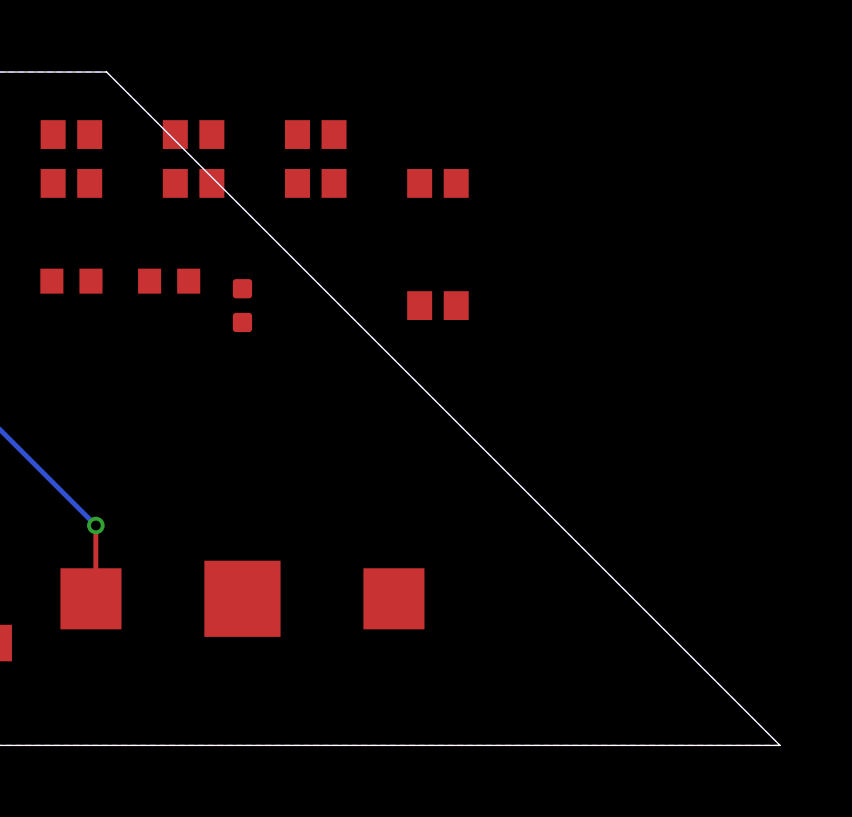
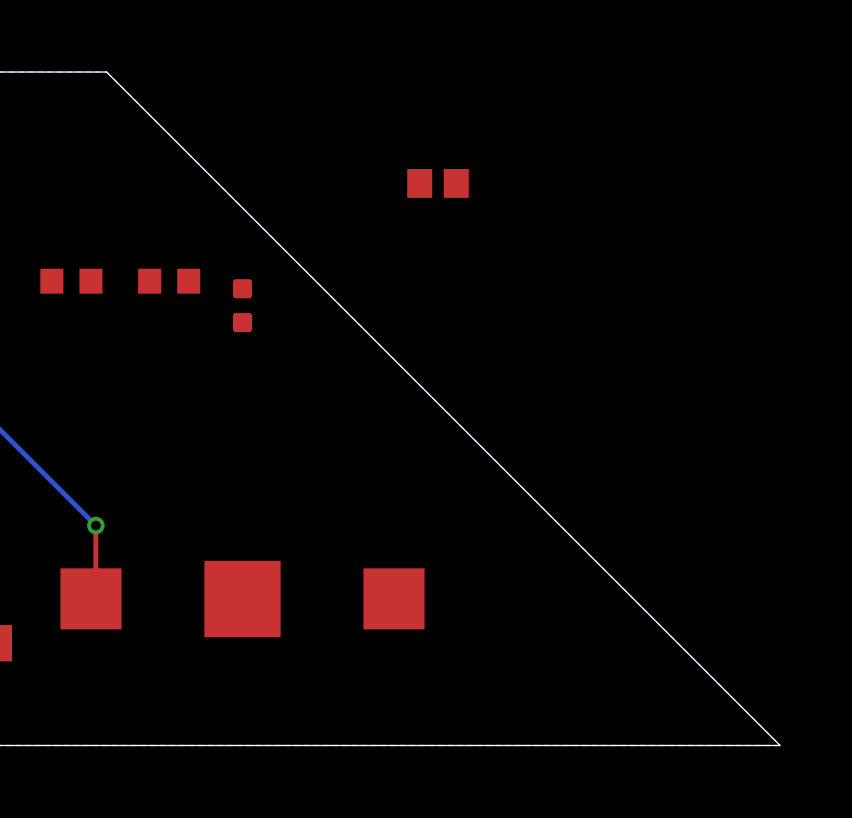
part: (71, 134) -> none
part: (193, 134) -> none
part: (315, 134) -> none
part: (71, 183) -> none
part: (193, 183) -> none
part: (315, 183) -> none
part: (437, 305) -> none

